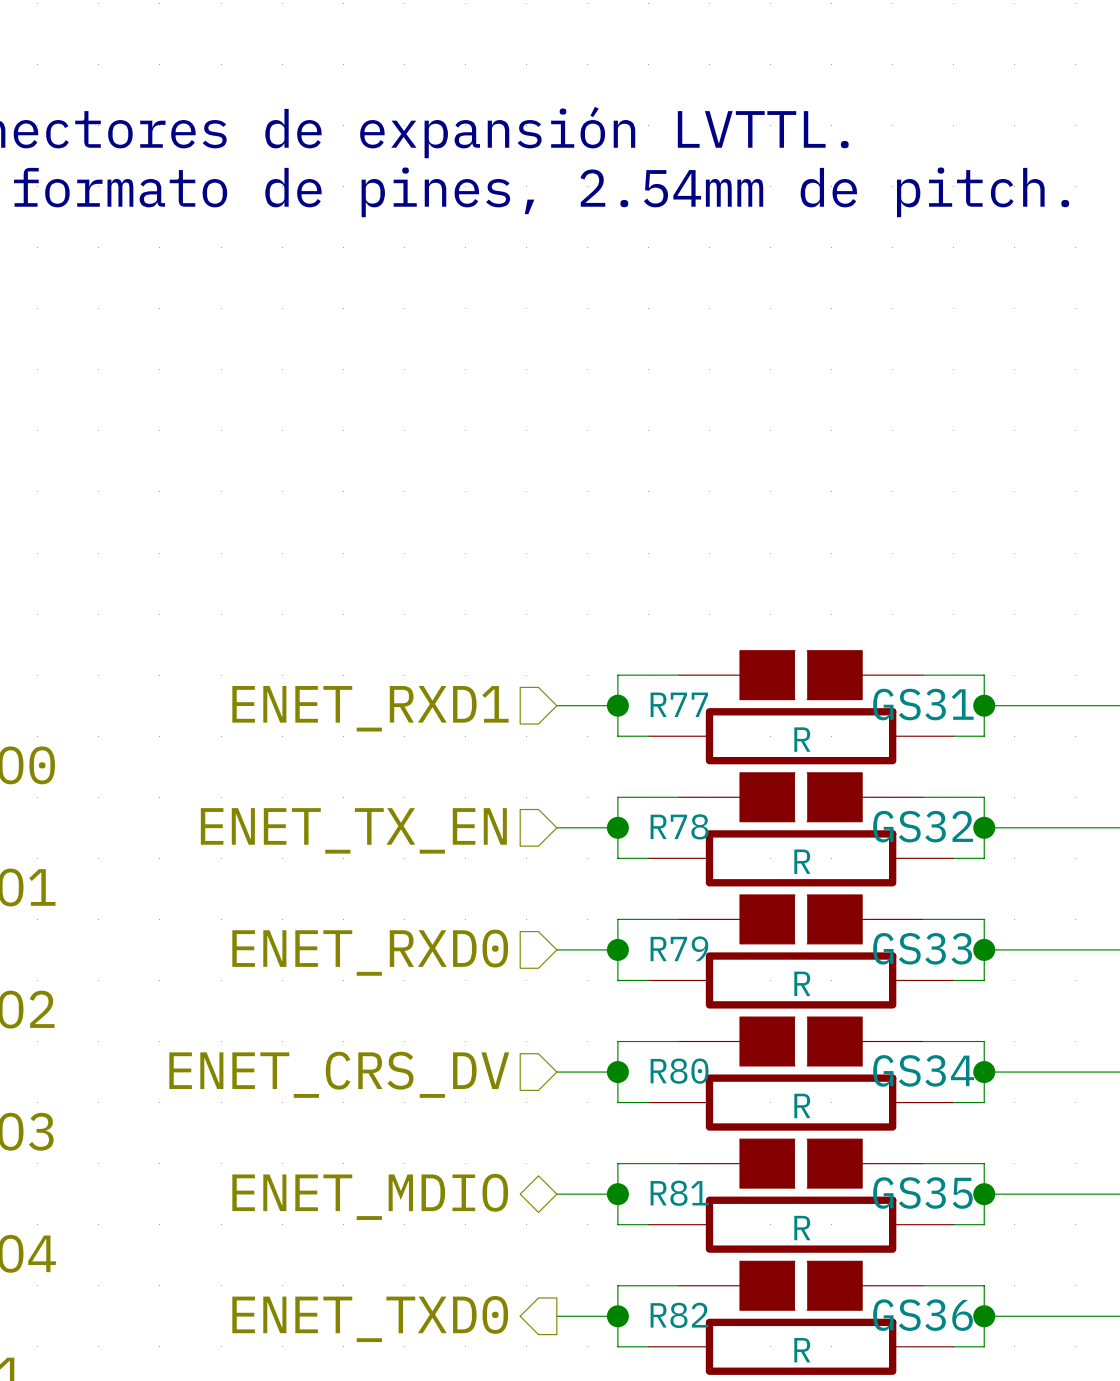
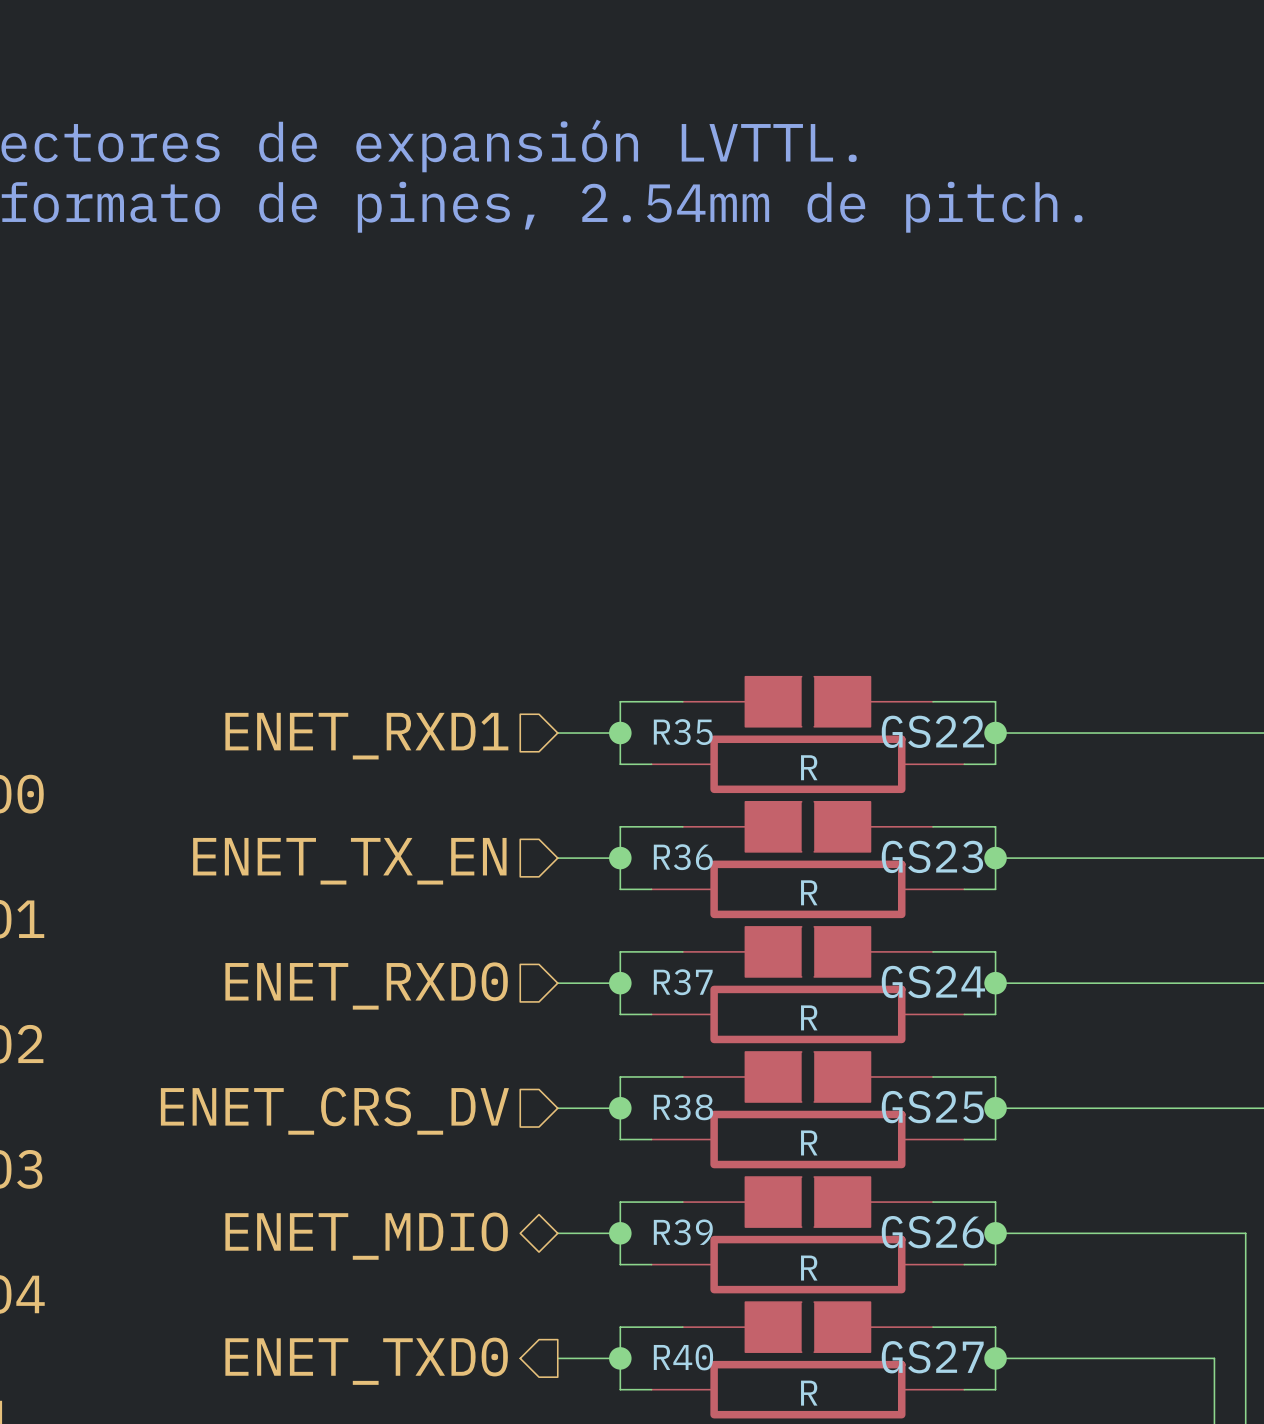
R77 name: R77 (679, 704) -> R35 (683, 732)
GS31 name: GS31 (923, 704) -> GS22 (932, 731)
R78 name: R78 (679, 826) -> R36 (683, 857)
GS32 name: GS32 (923, 826) -> GS23 (932, 856)
R79 name: R79 (679, 948) -> R37 (683, 982)
GS33 name: GS33 (922, 948) -> GS24 (933, 982)
GS34 name: GS34 (923, 1070) -> GS25 (932, 1107)
R80 name: R80 (679, 1071) -> R38 (683, 1107)
R81 name: R81 (679, 1193) -> R39 (683, 1232)
GS35 name: GS35 (922, 1193) -> GS26 (932, 1232)
R82 name: R82 (679, 1315) -> R40 (683, 1357)
GS36 name: GS36 (923, 1315) -> GS27 (932, 1357)

